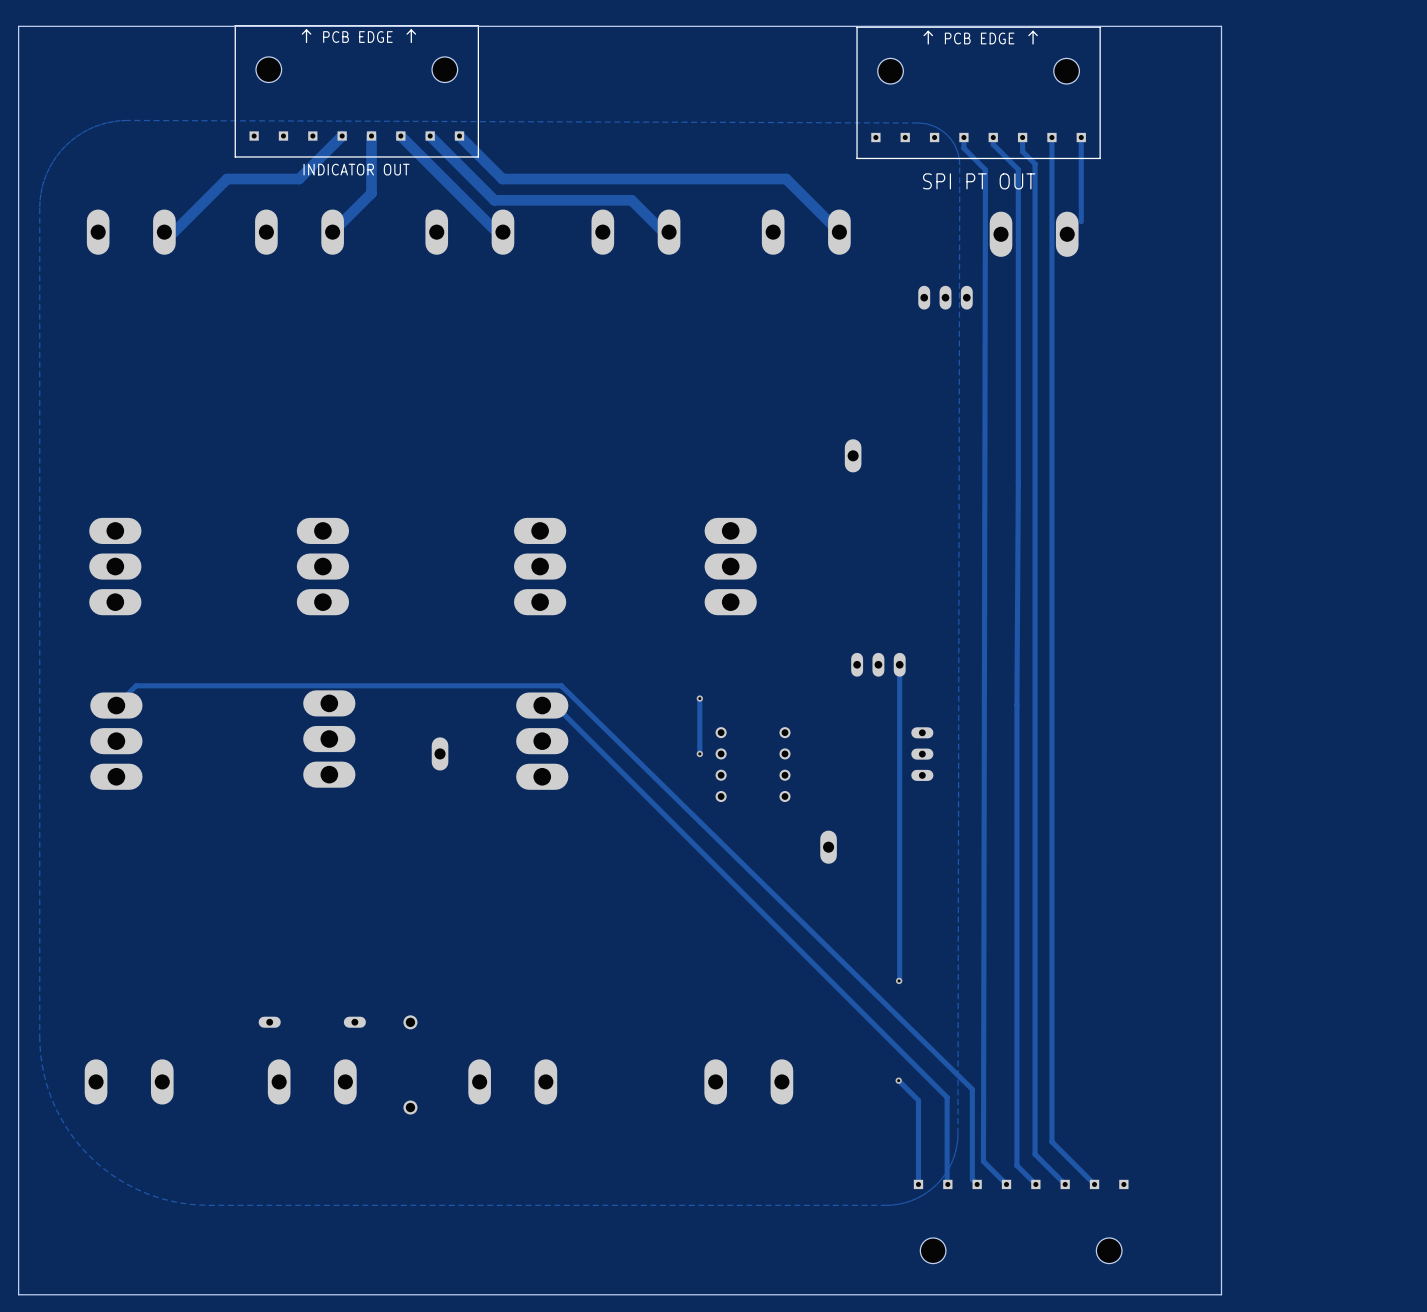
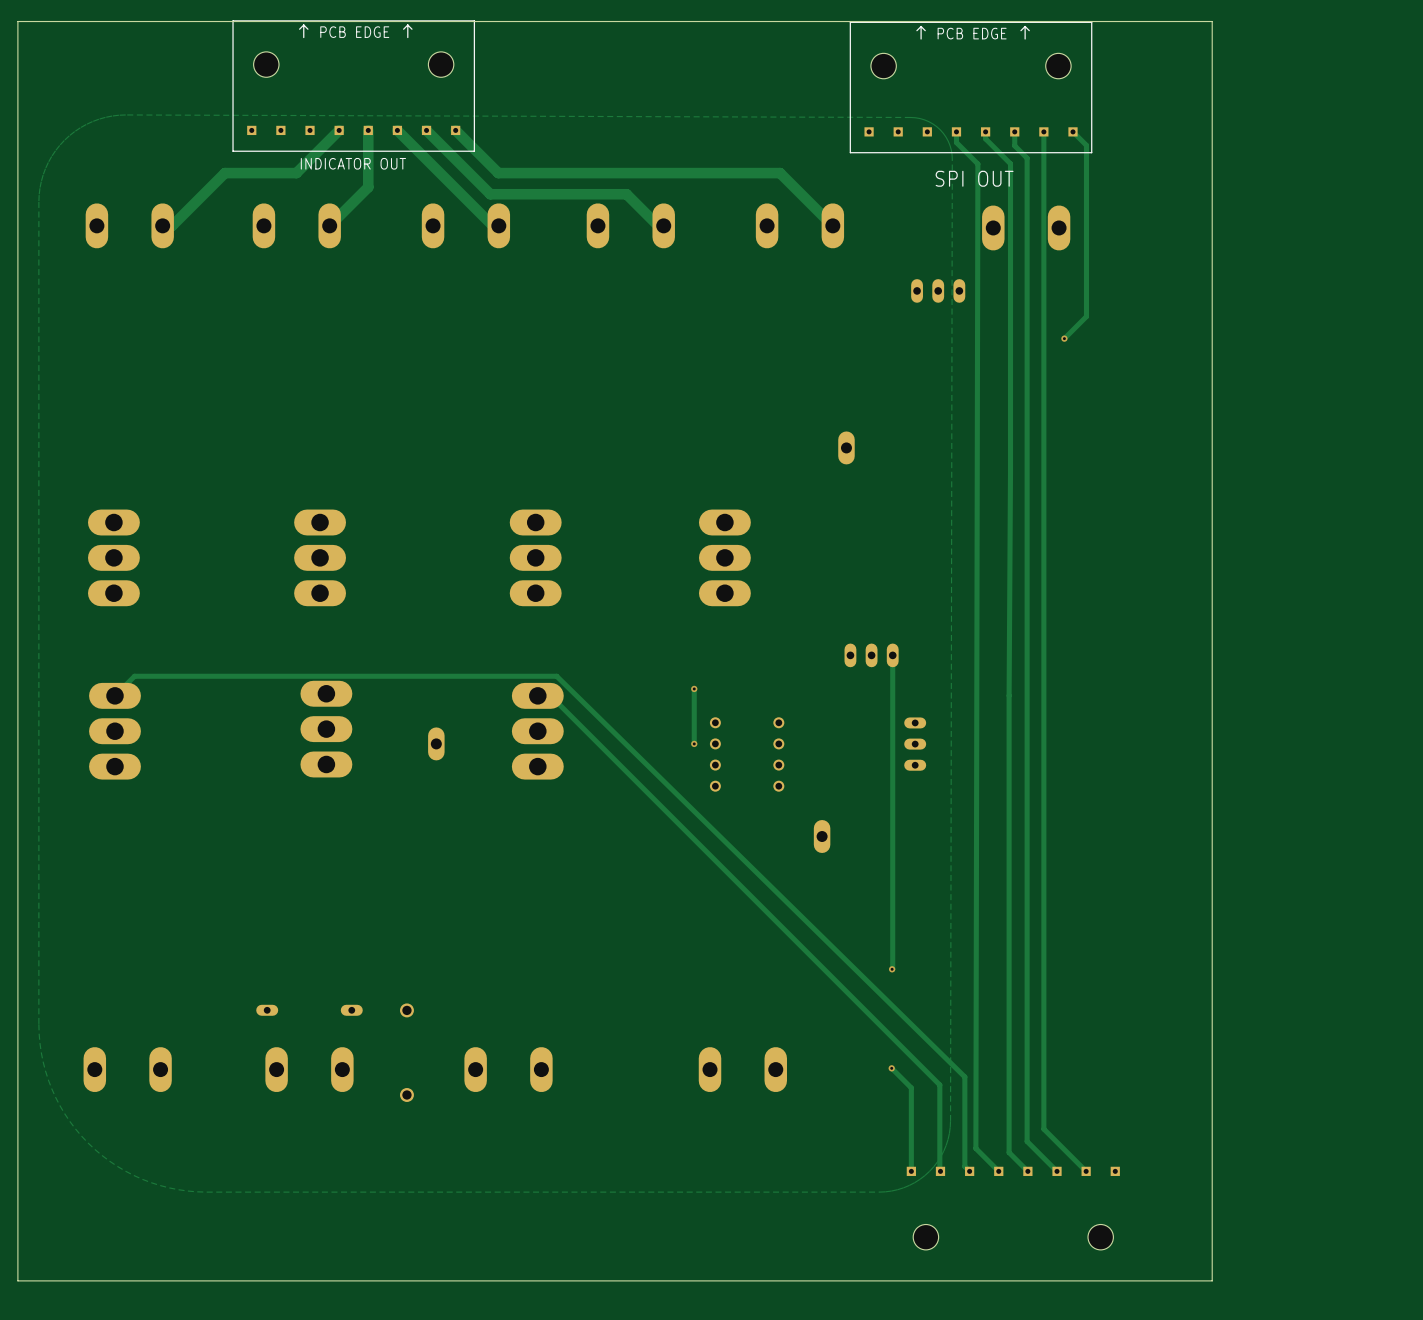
track: (1081, 137) (1081, 221) -> (1073, 131) (1086, 145) (1086, 316) (1064, 338)
text: SPI PT OUT (979, 181) -> SPI OUT (974, 178)
via: none -> (1064, 338)

